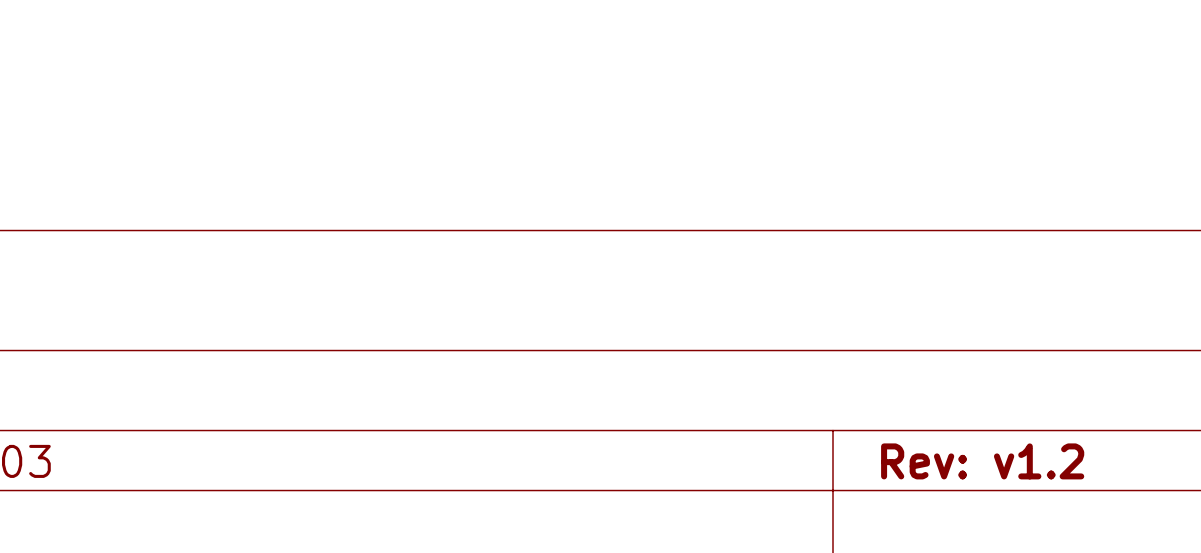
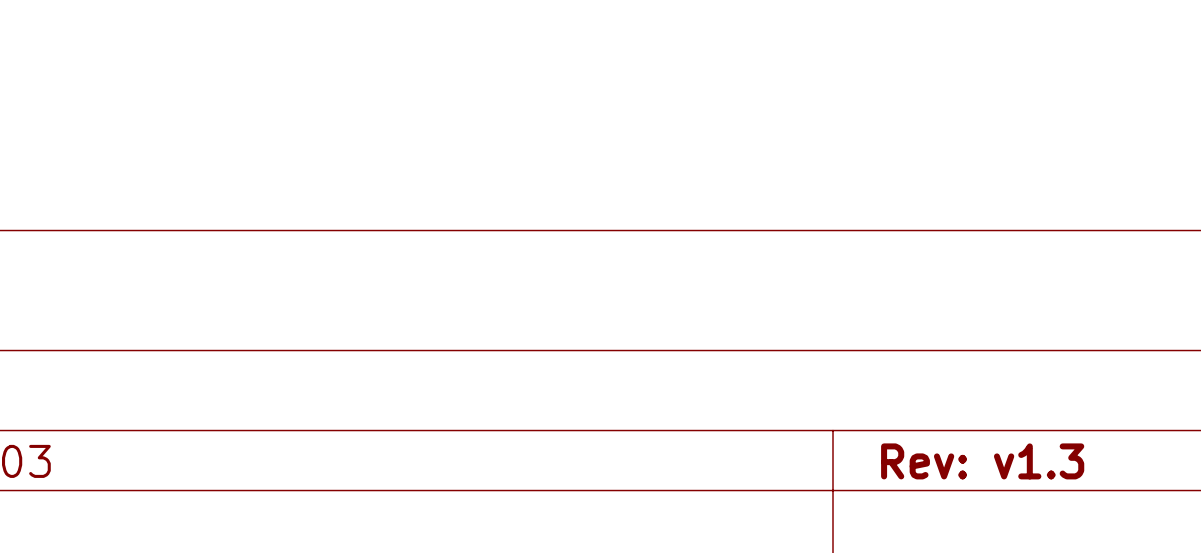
title block: Rev: v1.2 (982, 461) -> Rev: v1.3 (982, 461)

